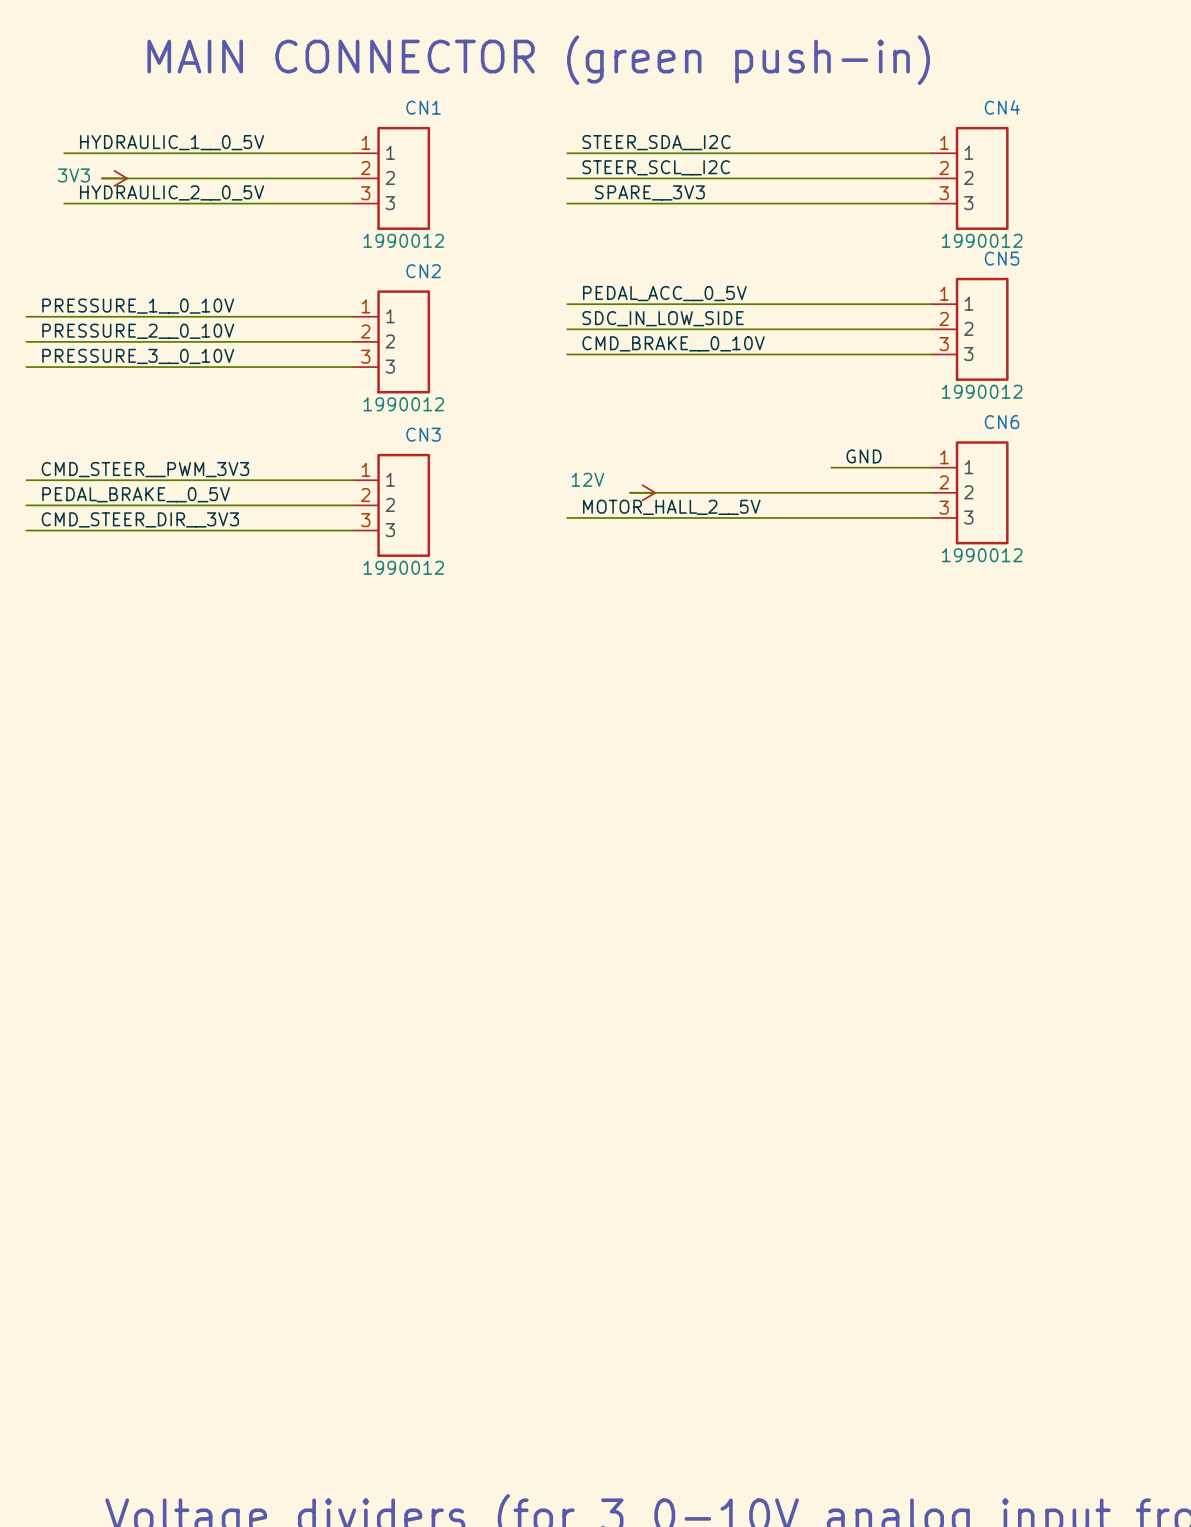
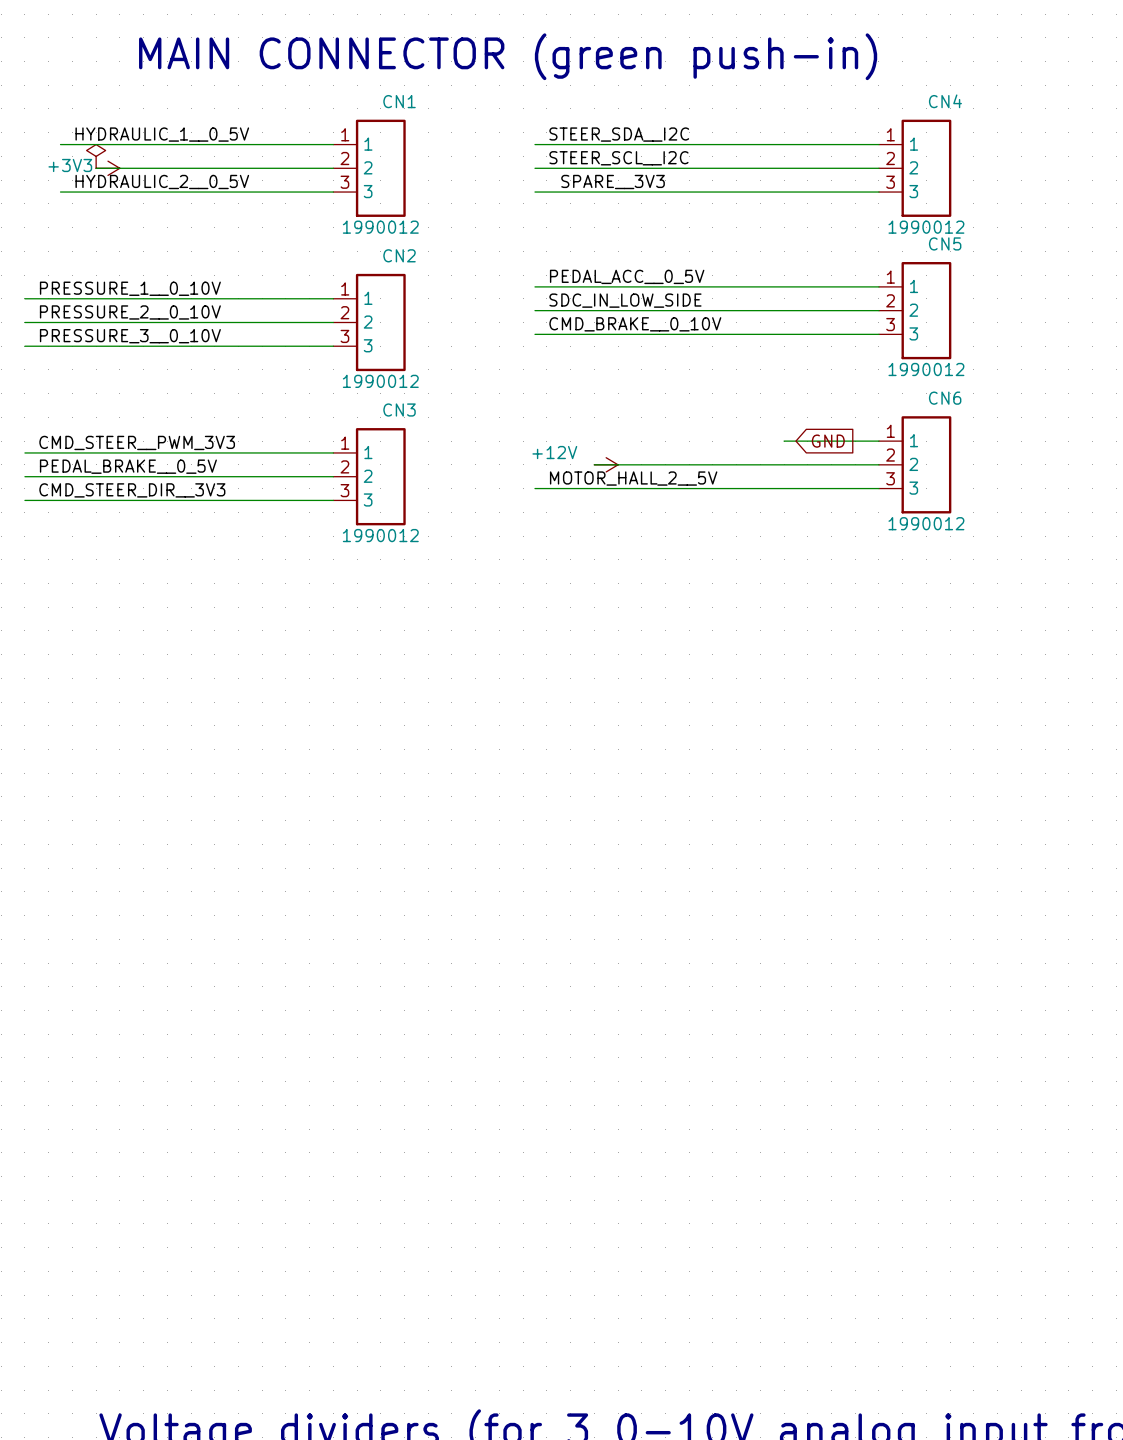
power symbol: none -> (96, 156)
power symbol: 3V3 (114, 178) -> +3V3 (107, 168)
label: GND (864, 456) -> none
global label: none -> GND (828, 441)
power symbol: 12V (642, 492) -> +12V (606, 464)

